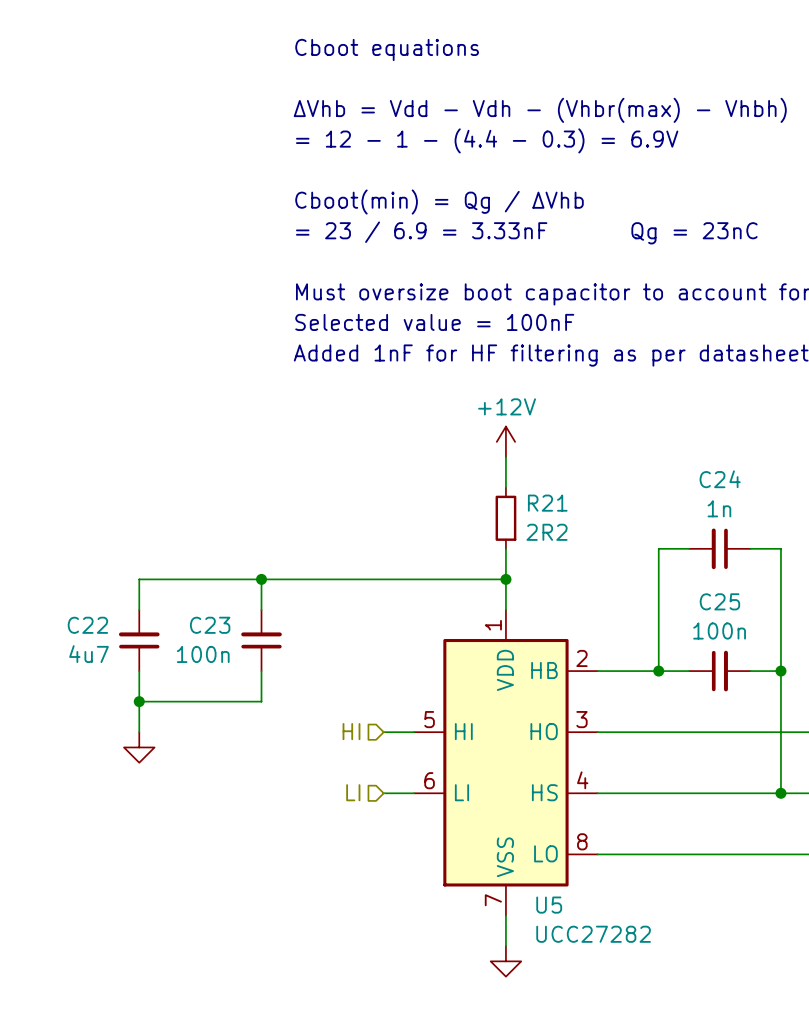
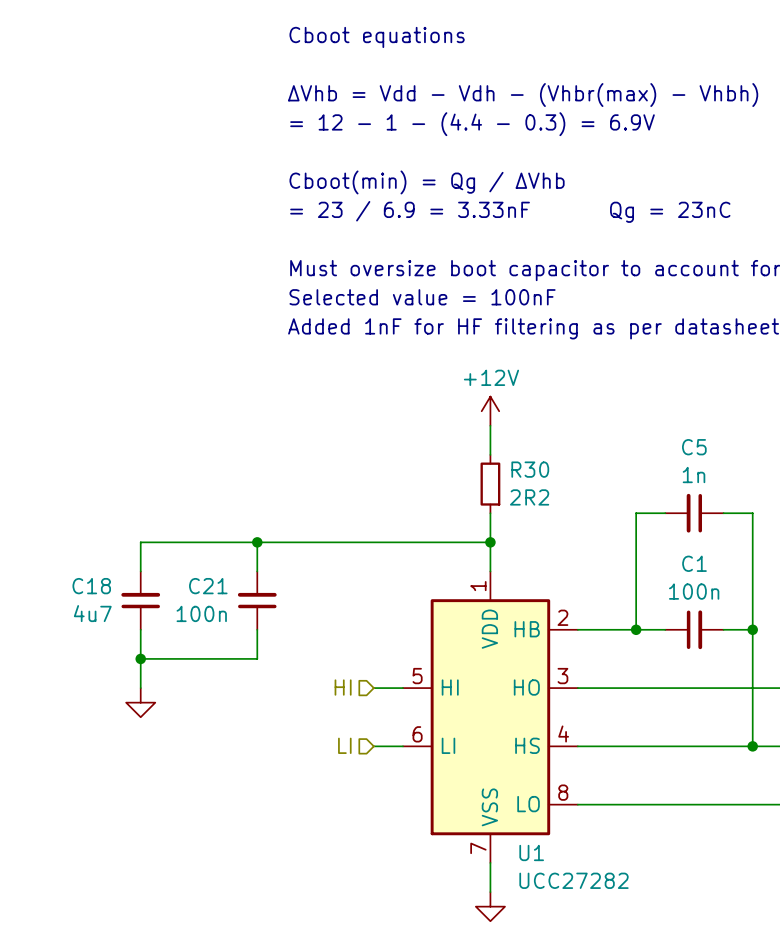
C24 name: C24 (720, 479) -> C5 (694, 447)
R21 name: R21 (547, 503) -> R30 (530, 469)
C25 name: C25 (719, 601) -> C1 (694, 563)
C22 name: C22 (87, 625) -> C18 (91, 586)
C23 name: C23 (210, 625) -> C21 (208, 586)
U5 name: U5 (549, 905) -> U1 (531, 852)

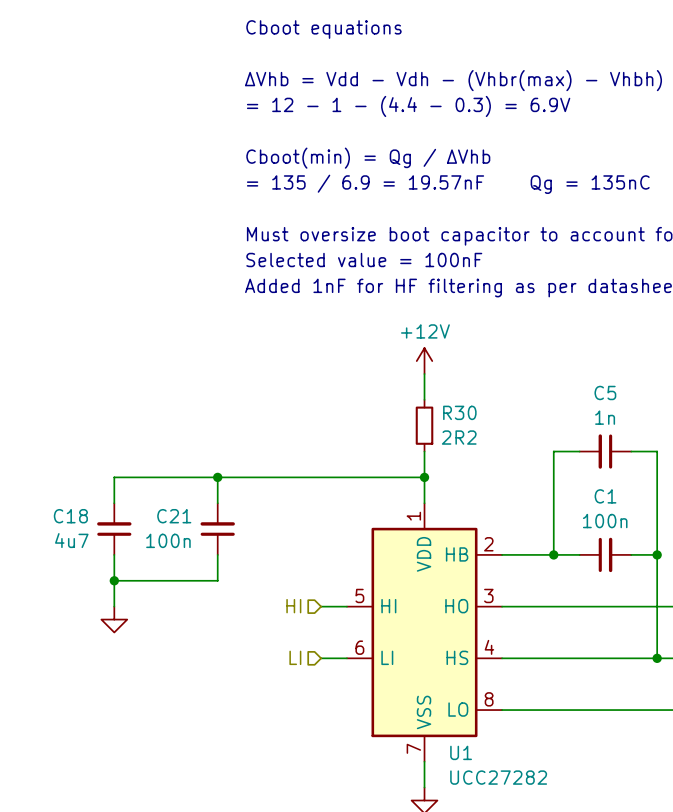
text: = 23 / 6.9 = 3.33nF (410, 211) -> = 135 / 6.9 = 19.57nF (365, 183)
text: Qg = 23nC (670, 212) -> Qg = 135nC (590, 184)

